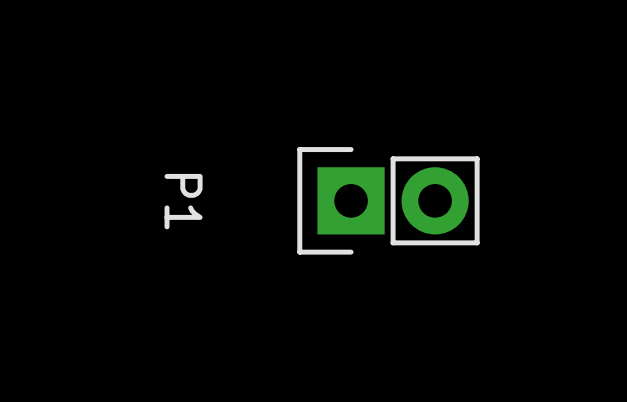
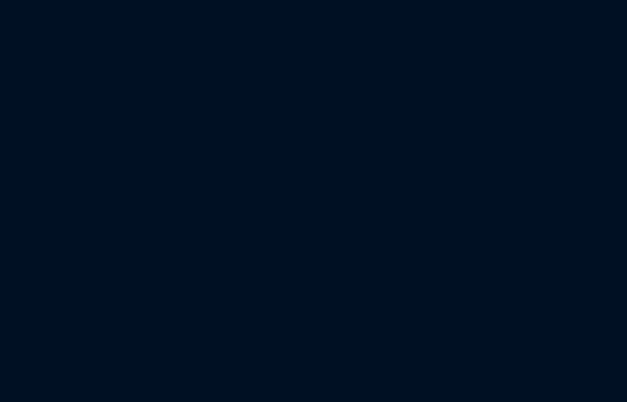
P1: (388, 200) -> none

